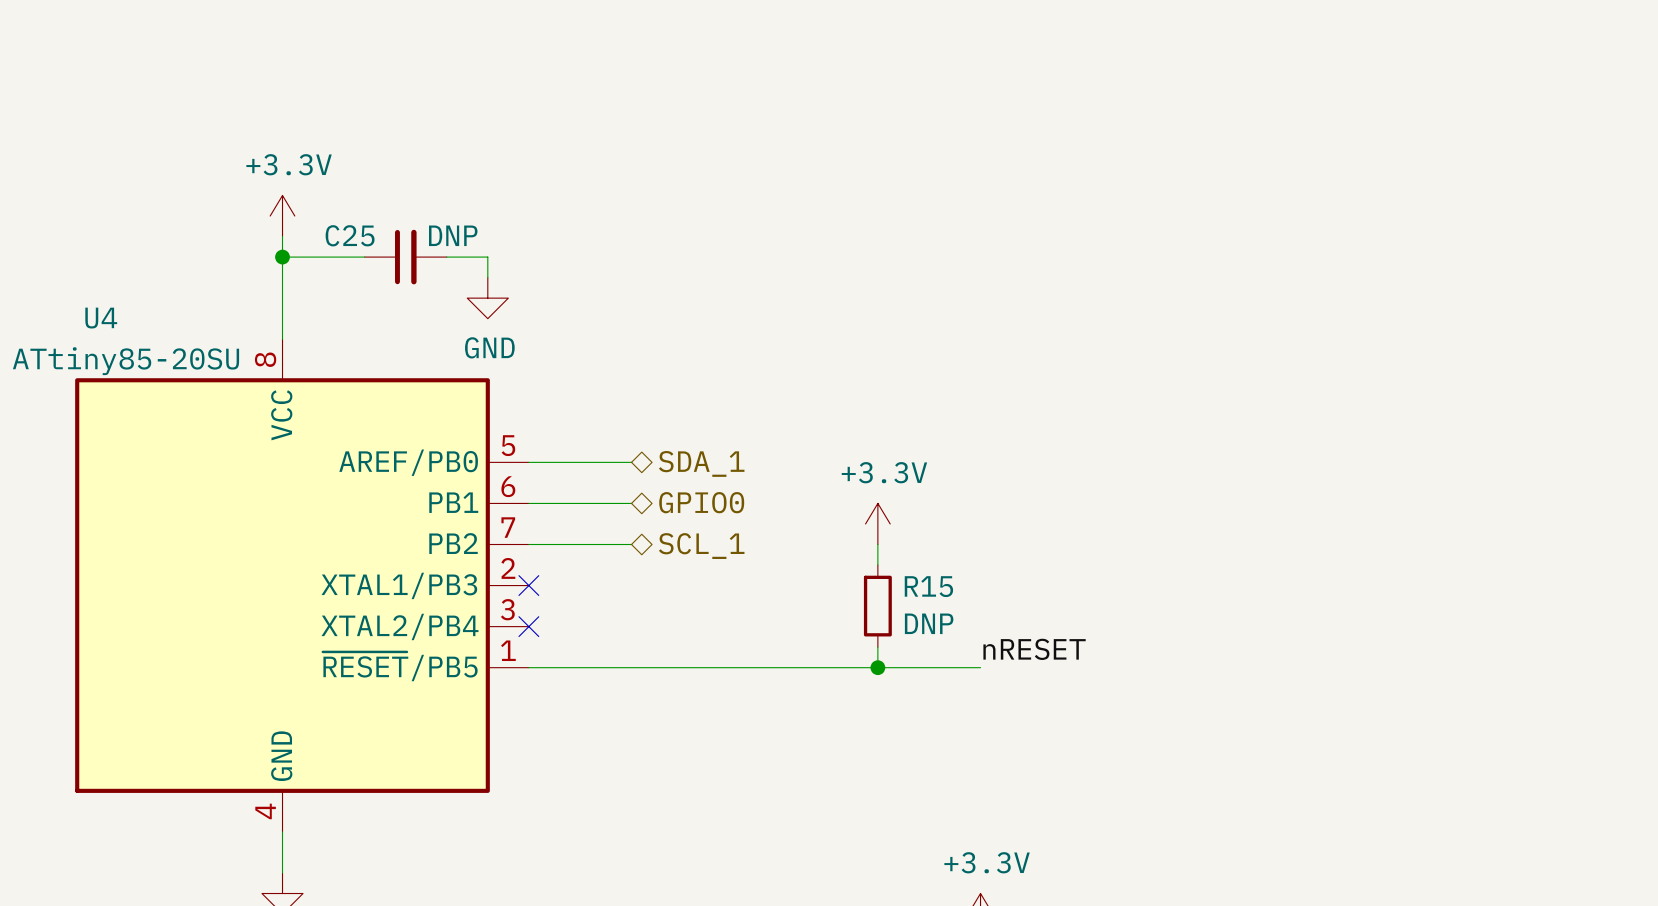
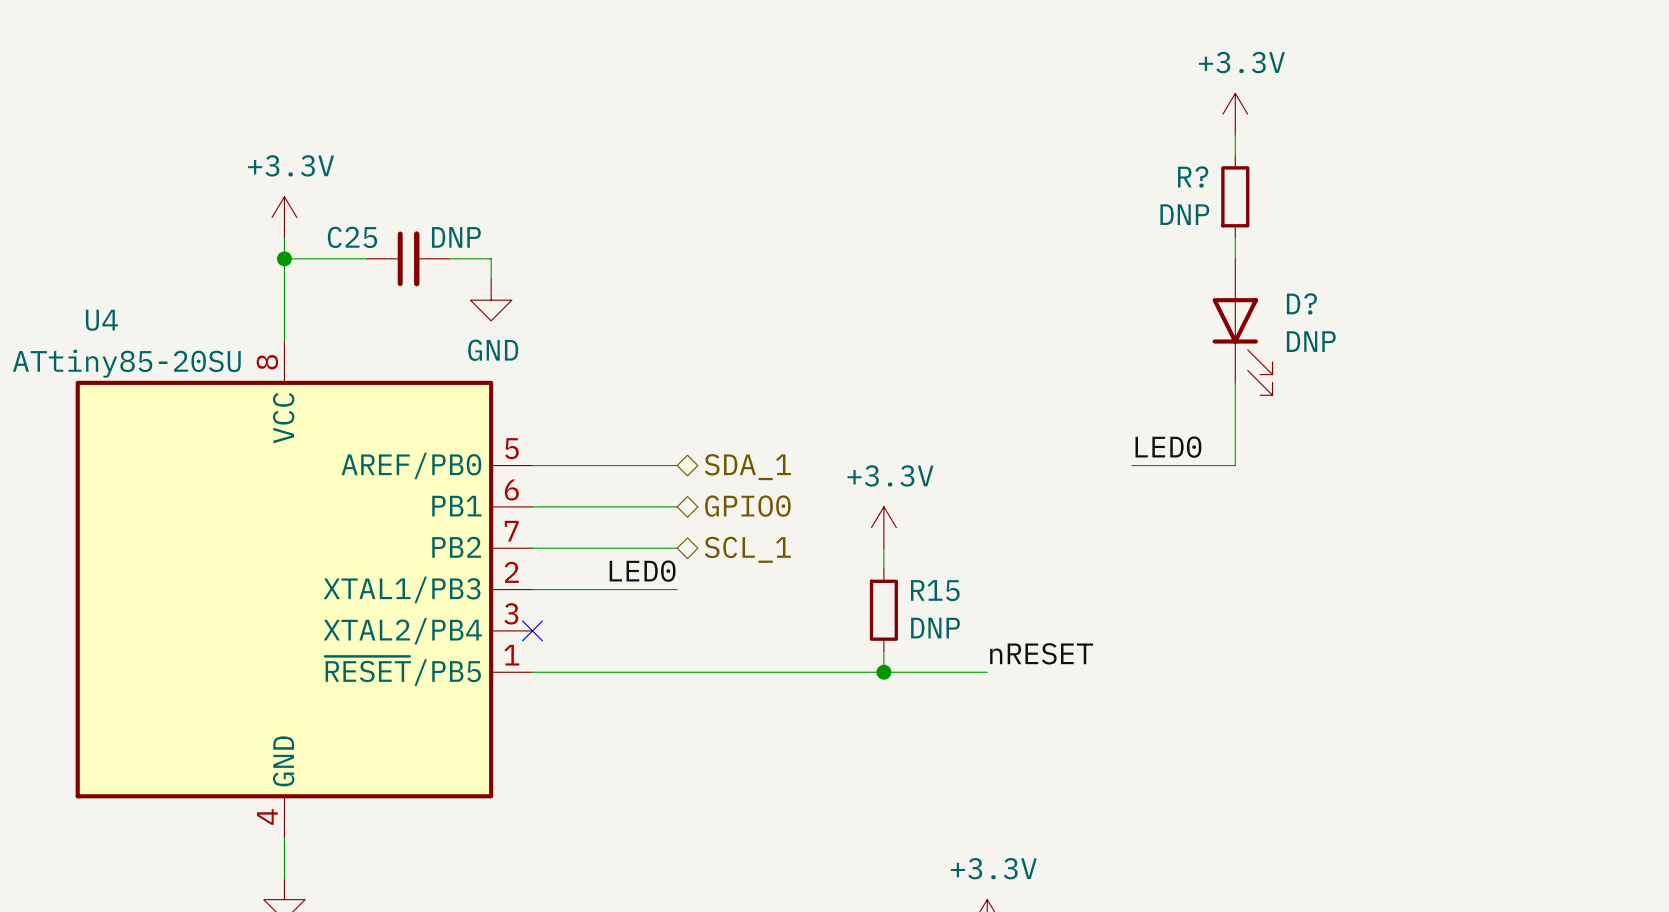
power symbol: none -> +3.3V (1235, 114)
wire: none -> (1235, 134) (1235, 155)
R?: none -> DNP (1235, 196)
wire: none -> (1235, 238) (1235, 258)
D?: none -> DNP (1242, 327)
wire: none -> (1235, 382) (1235, 465) (1131, 465)
label: none -> LED0 (1168, 447)
wire: none -> (635, 465) (677, 465)
hierarchical label position: SDA_1 (701, 463) -> SDA_1 (747, 467)
hierarchical label position: GPIO0 (701, 502) -> GPIO0 (747, 506)
wire: none -> (635, 506) (677, 506)
wire: none -> (635, 548) (677, 548)
hierarchical label position: SCL_1 (701, 546) -> SCL_1 (747, 549)
label: none -> LED0 (642, 571)
wire: none -> (532, 589) (677, 589)
no-connect mark: (528, 585) -> none

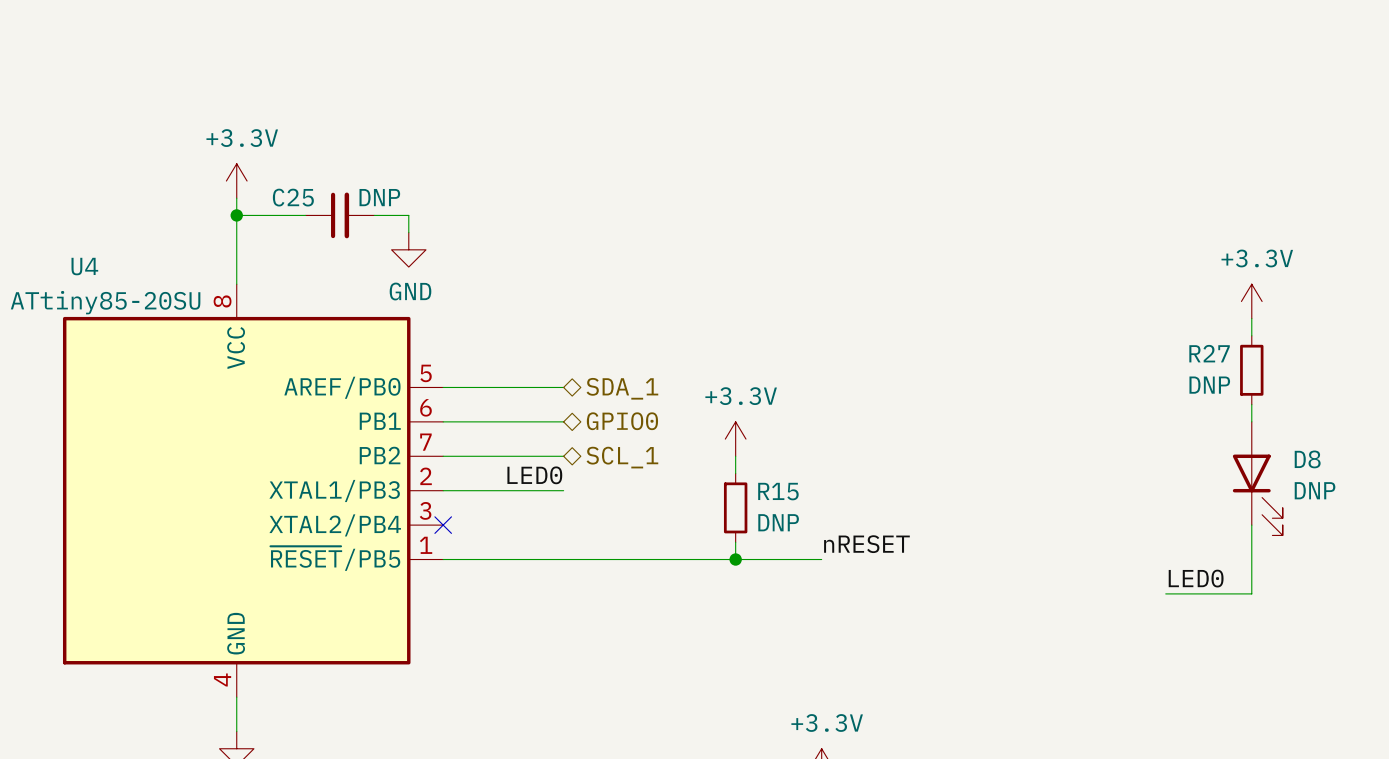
power symbol position: +3.3V (1235, 114) -> +3.3V (1251, 301)
wire: (1235, 134) (1235, 155) -> (1251, 318) (1251, 335)
R?: DNP (1235, 196) -> none
wire: (1235, 238) (1235, 258) -> (1251, 404) (1251, 421)
D?: DNP (1242, 327) -> none
wire: (1235, 382) (1235, 465) (1131, 465) -> (1251, 525) (1251, 593) (1165, 593)
R27: none -> DNP (1251, 370)
label position: LED0 (1168, 447) -> LED0 (1196, 578)
D8: none -> DNP (1257, 478)

